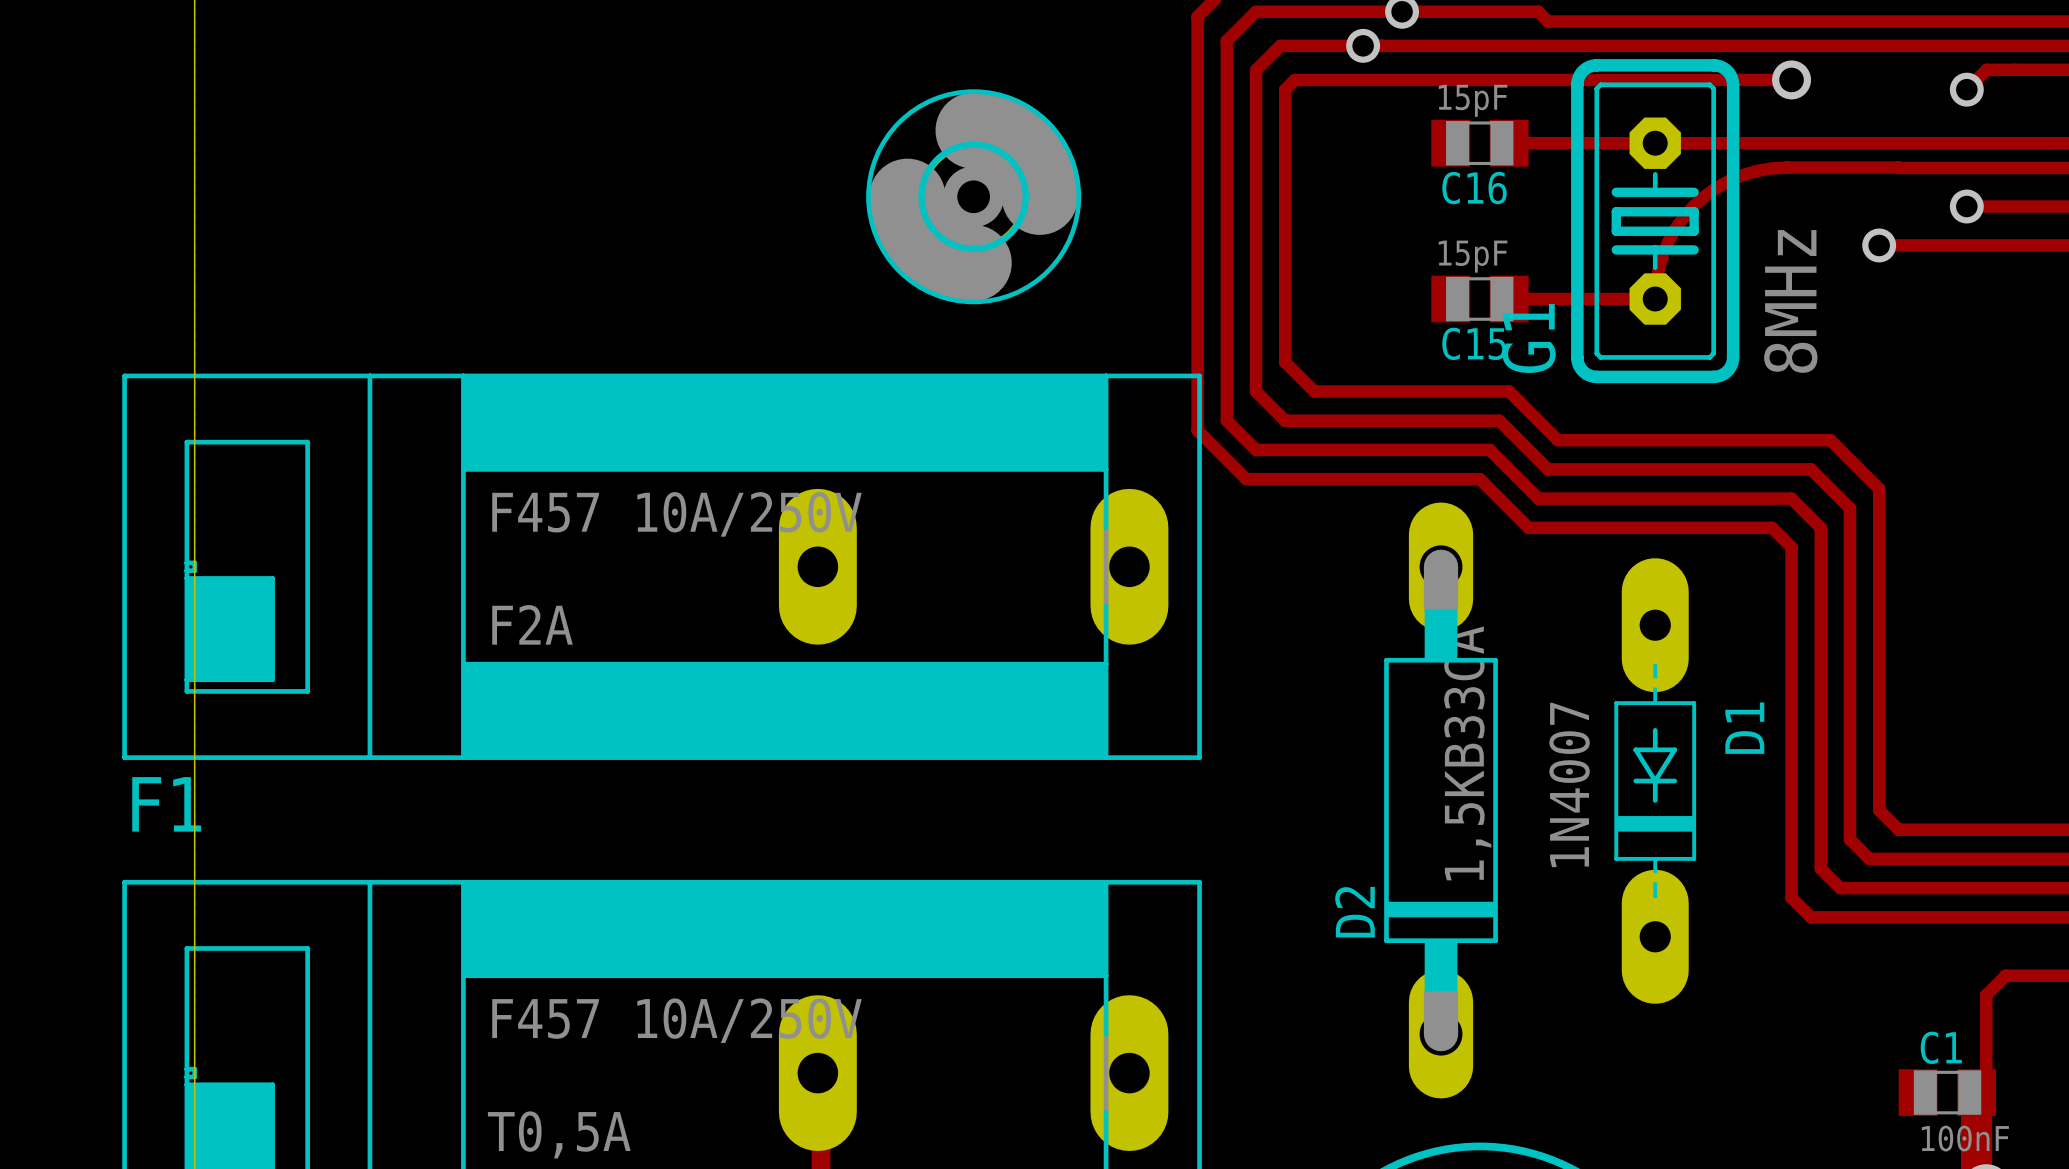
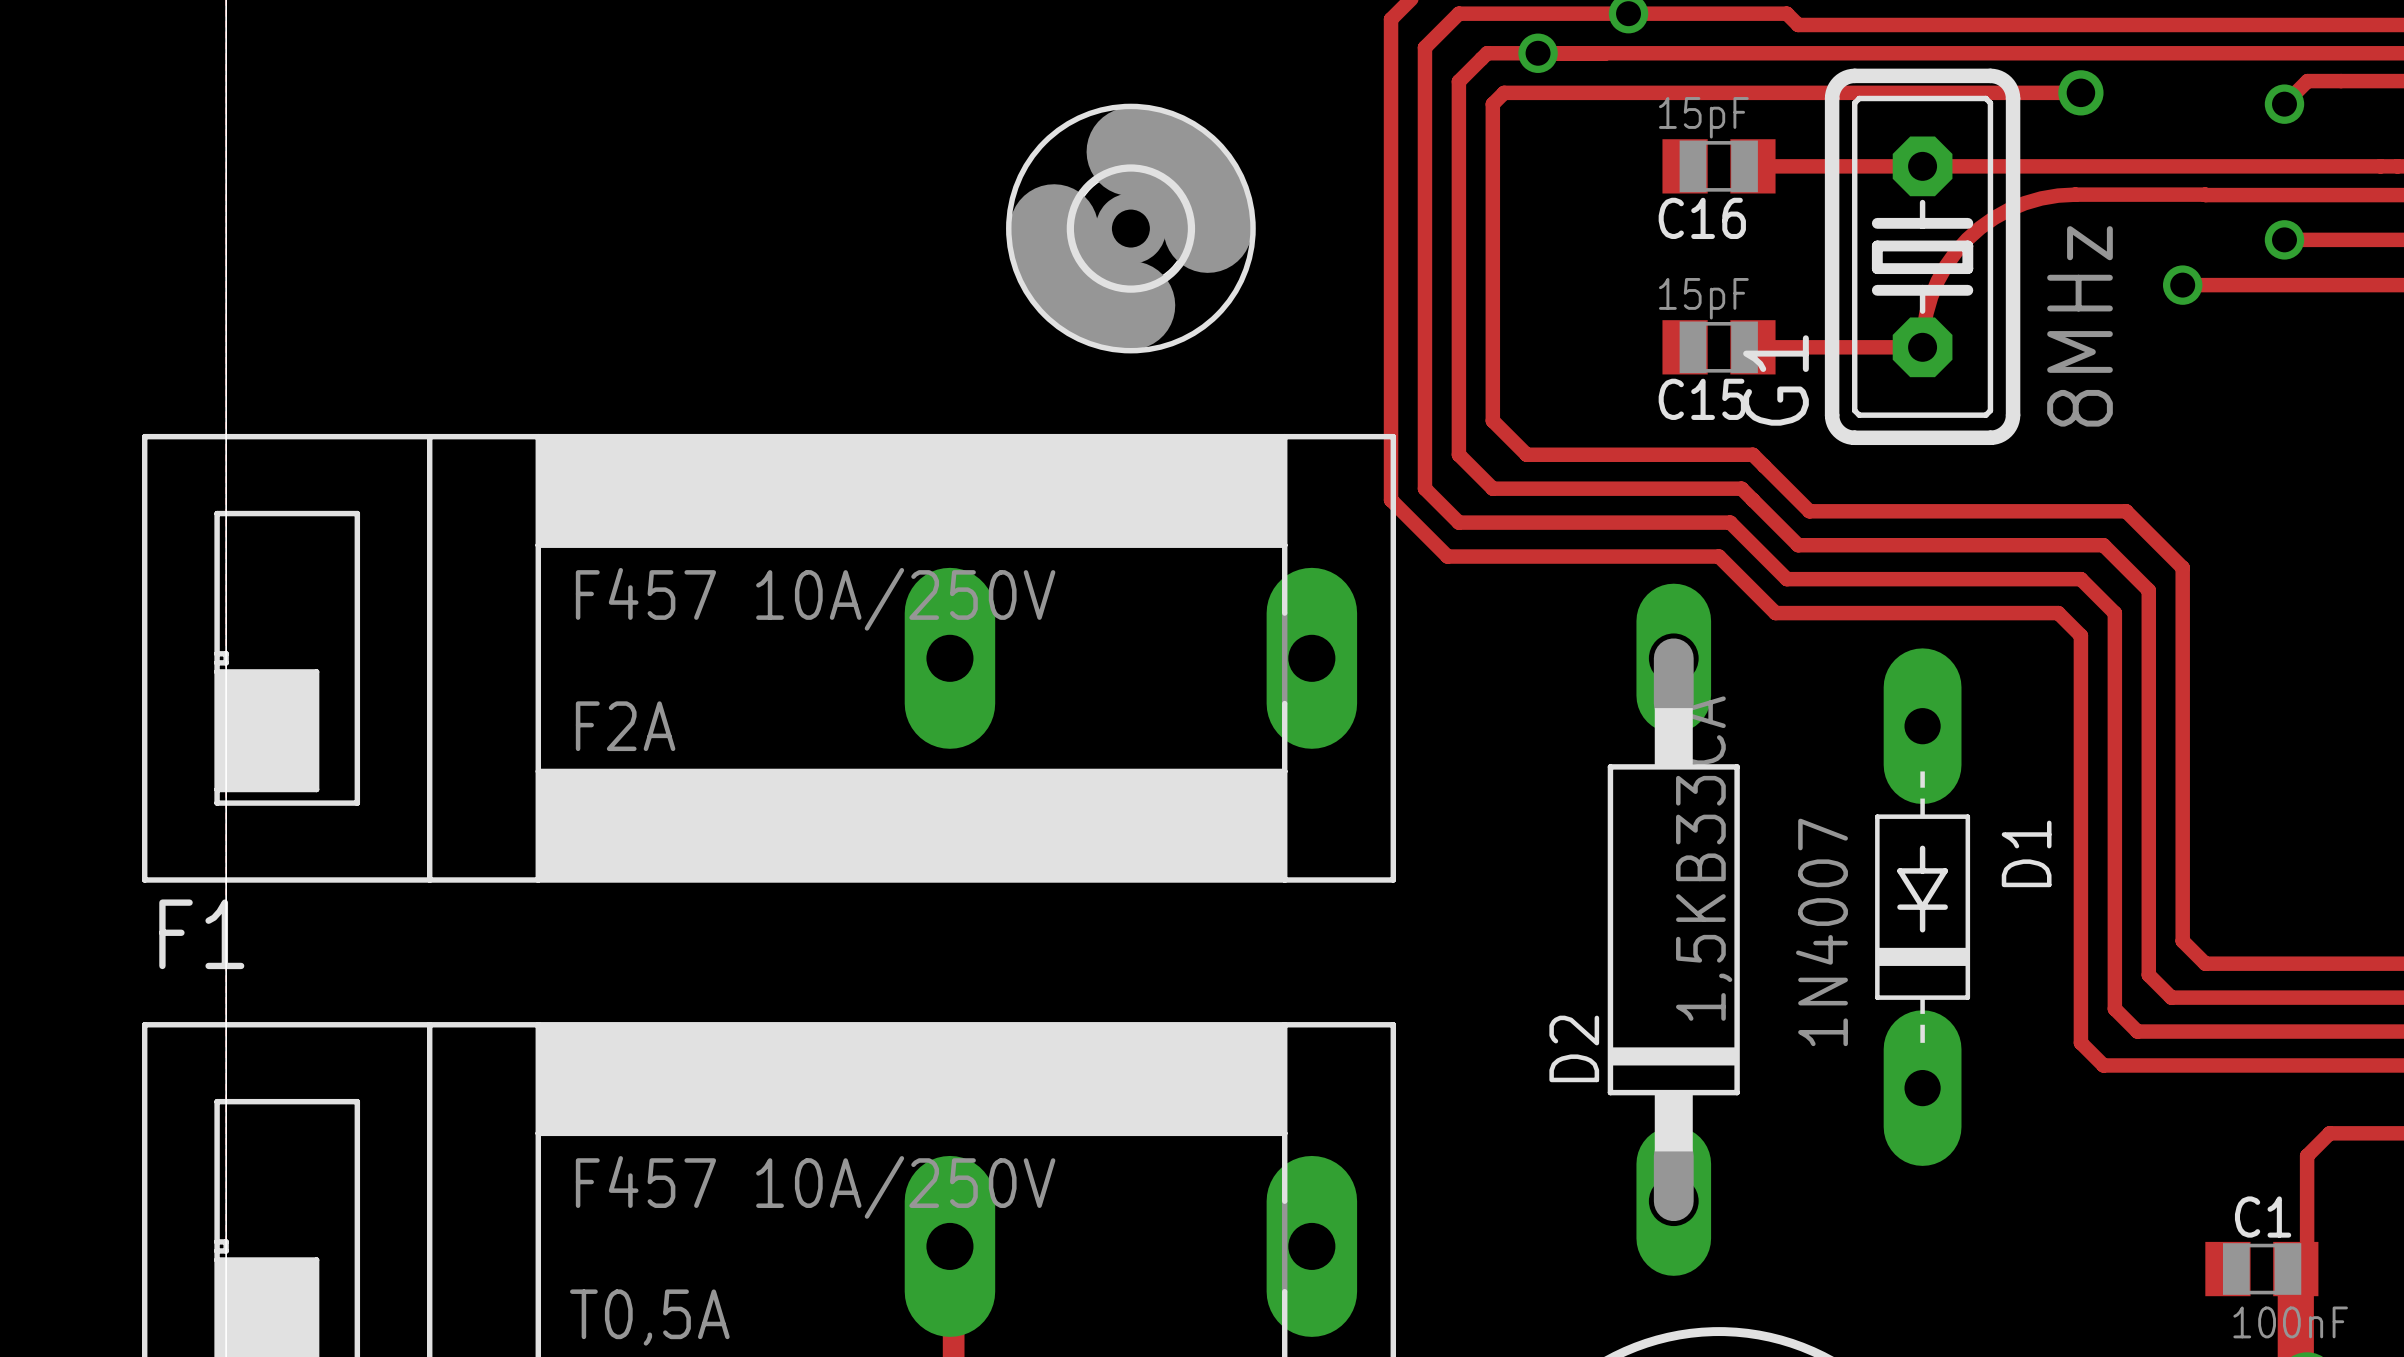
via position: (1363, 45) -> (1538, 53)

